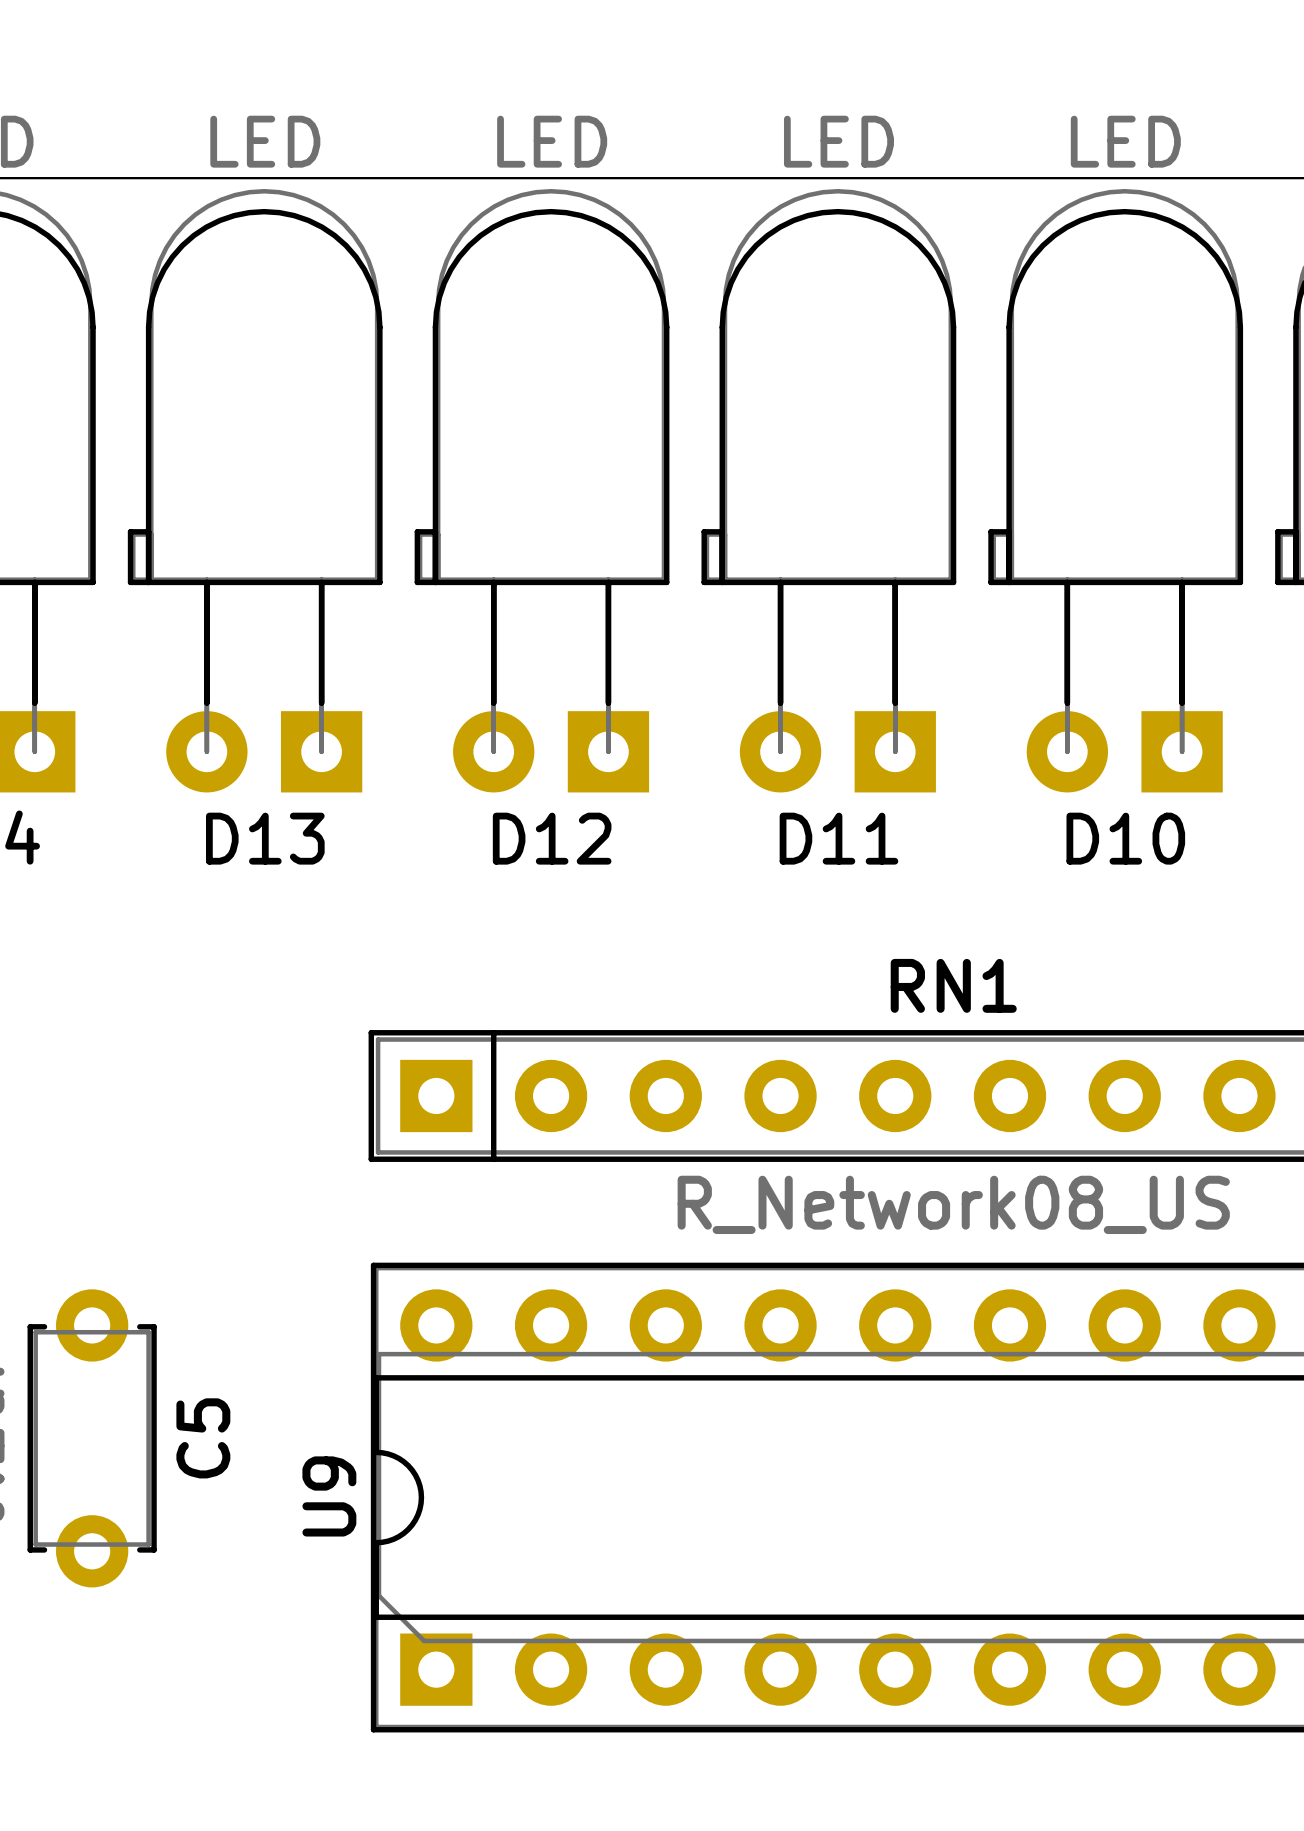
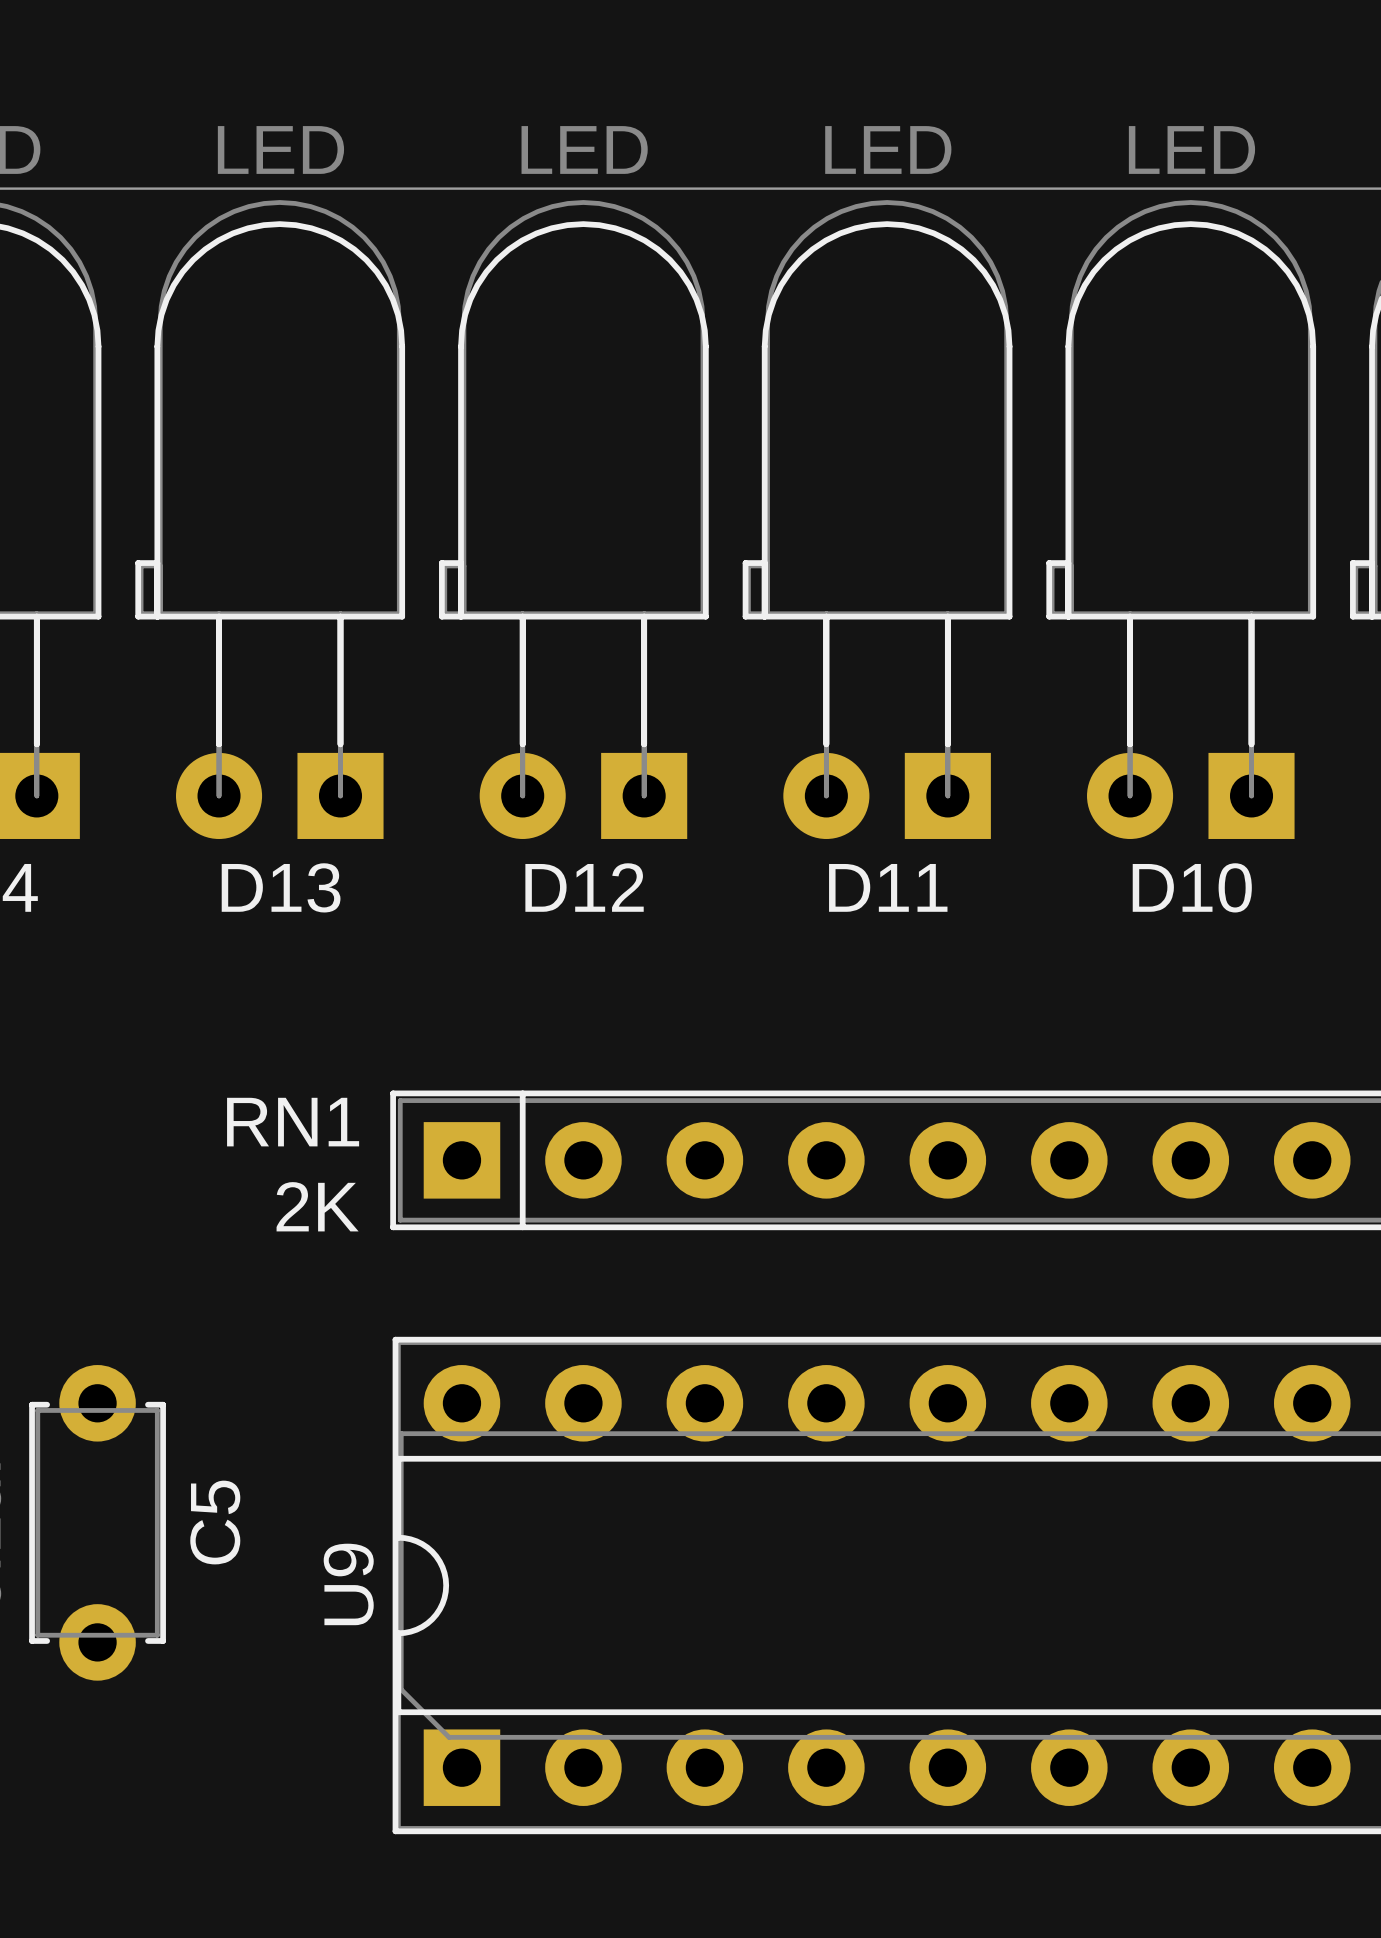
RN1 name position: RN1 (953, 985) -> RN1 (293, 1122)
RN1 value: R_Network08_US (953, 1204) -> 2K (317, 1206)

